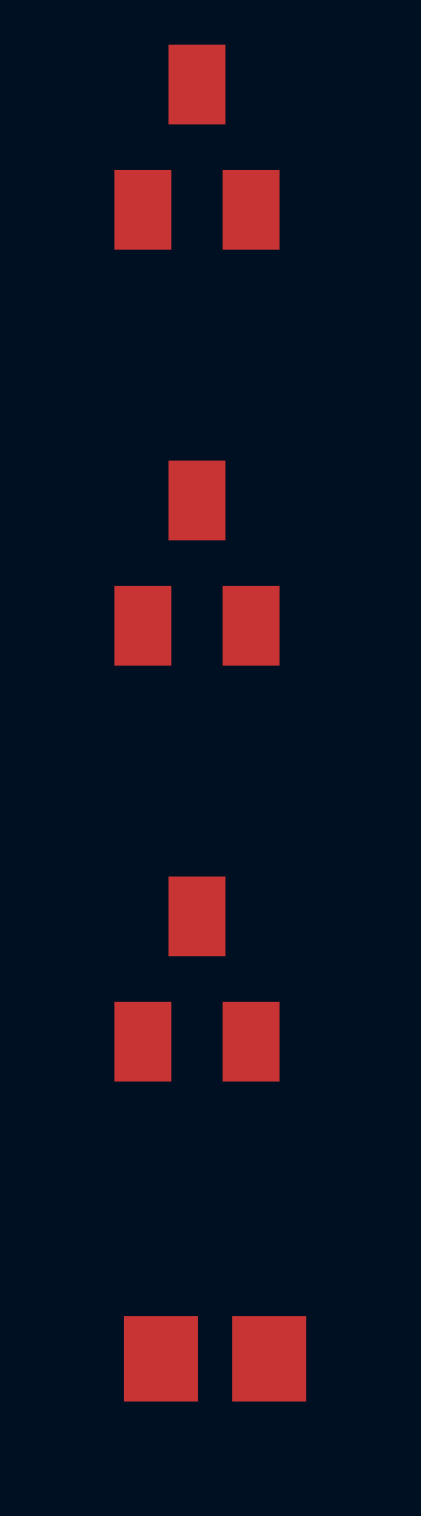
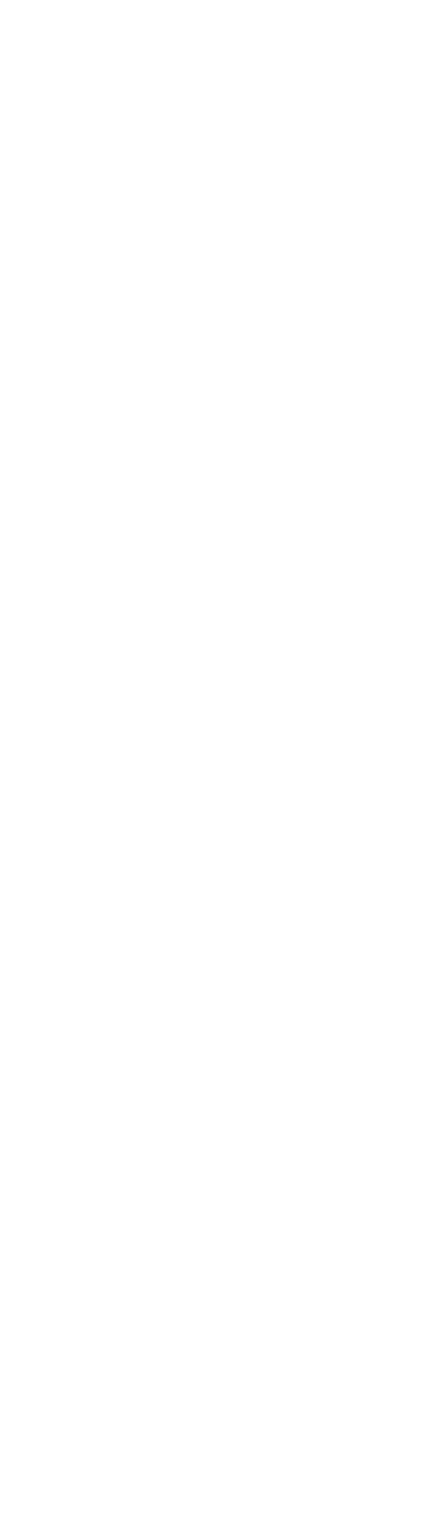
part: (196, 147) -> none
part: (196, 563) -> none
part: (196, 979) -> none
part: (215, 1358) -> none

